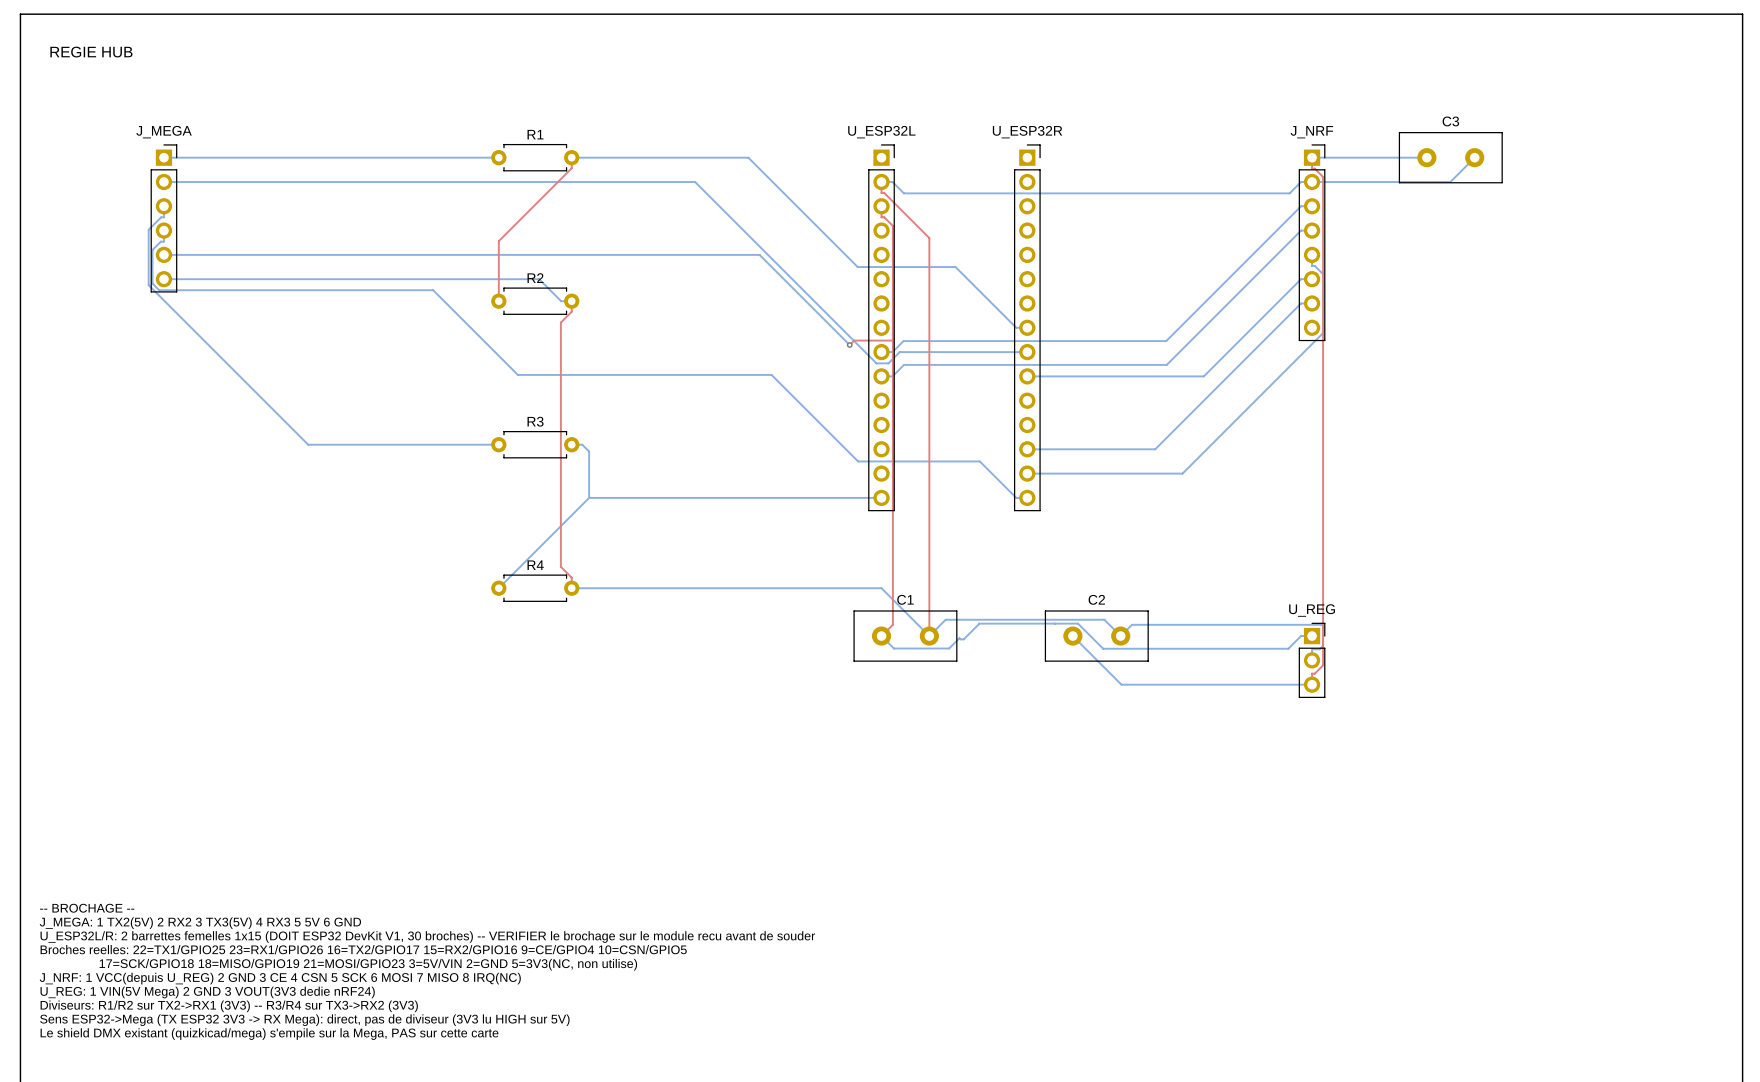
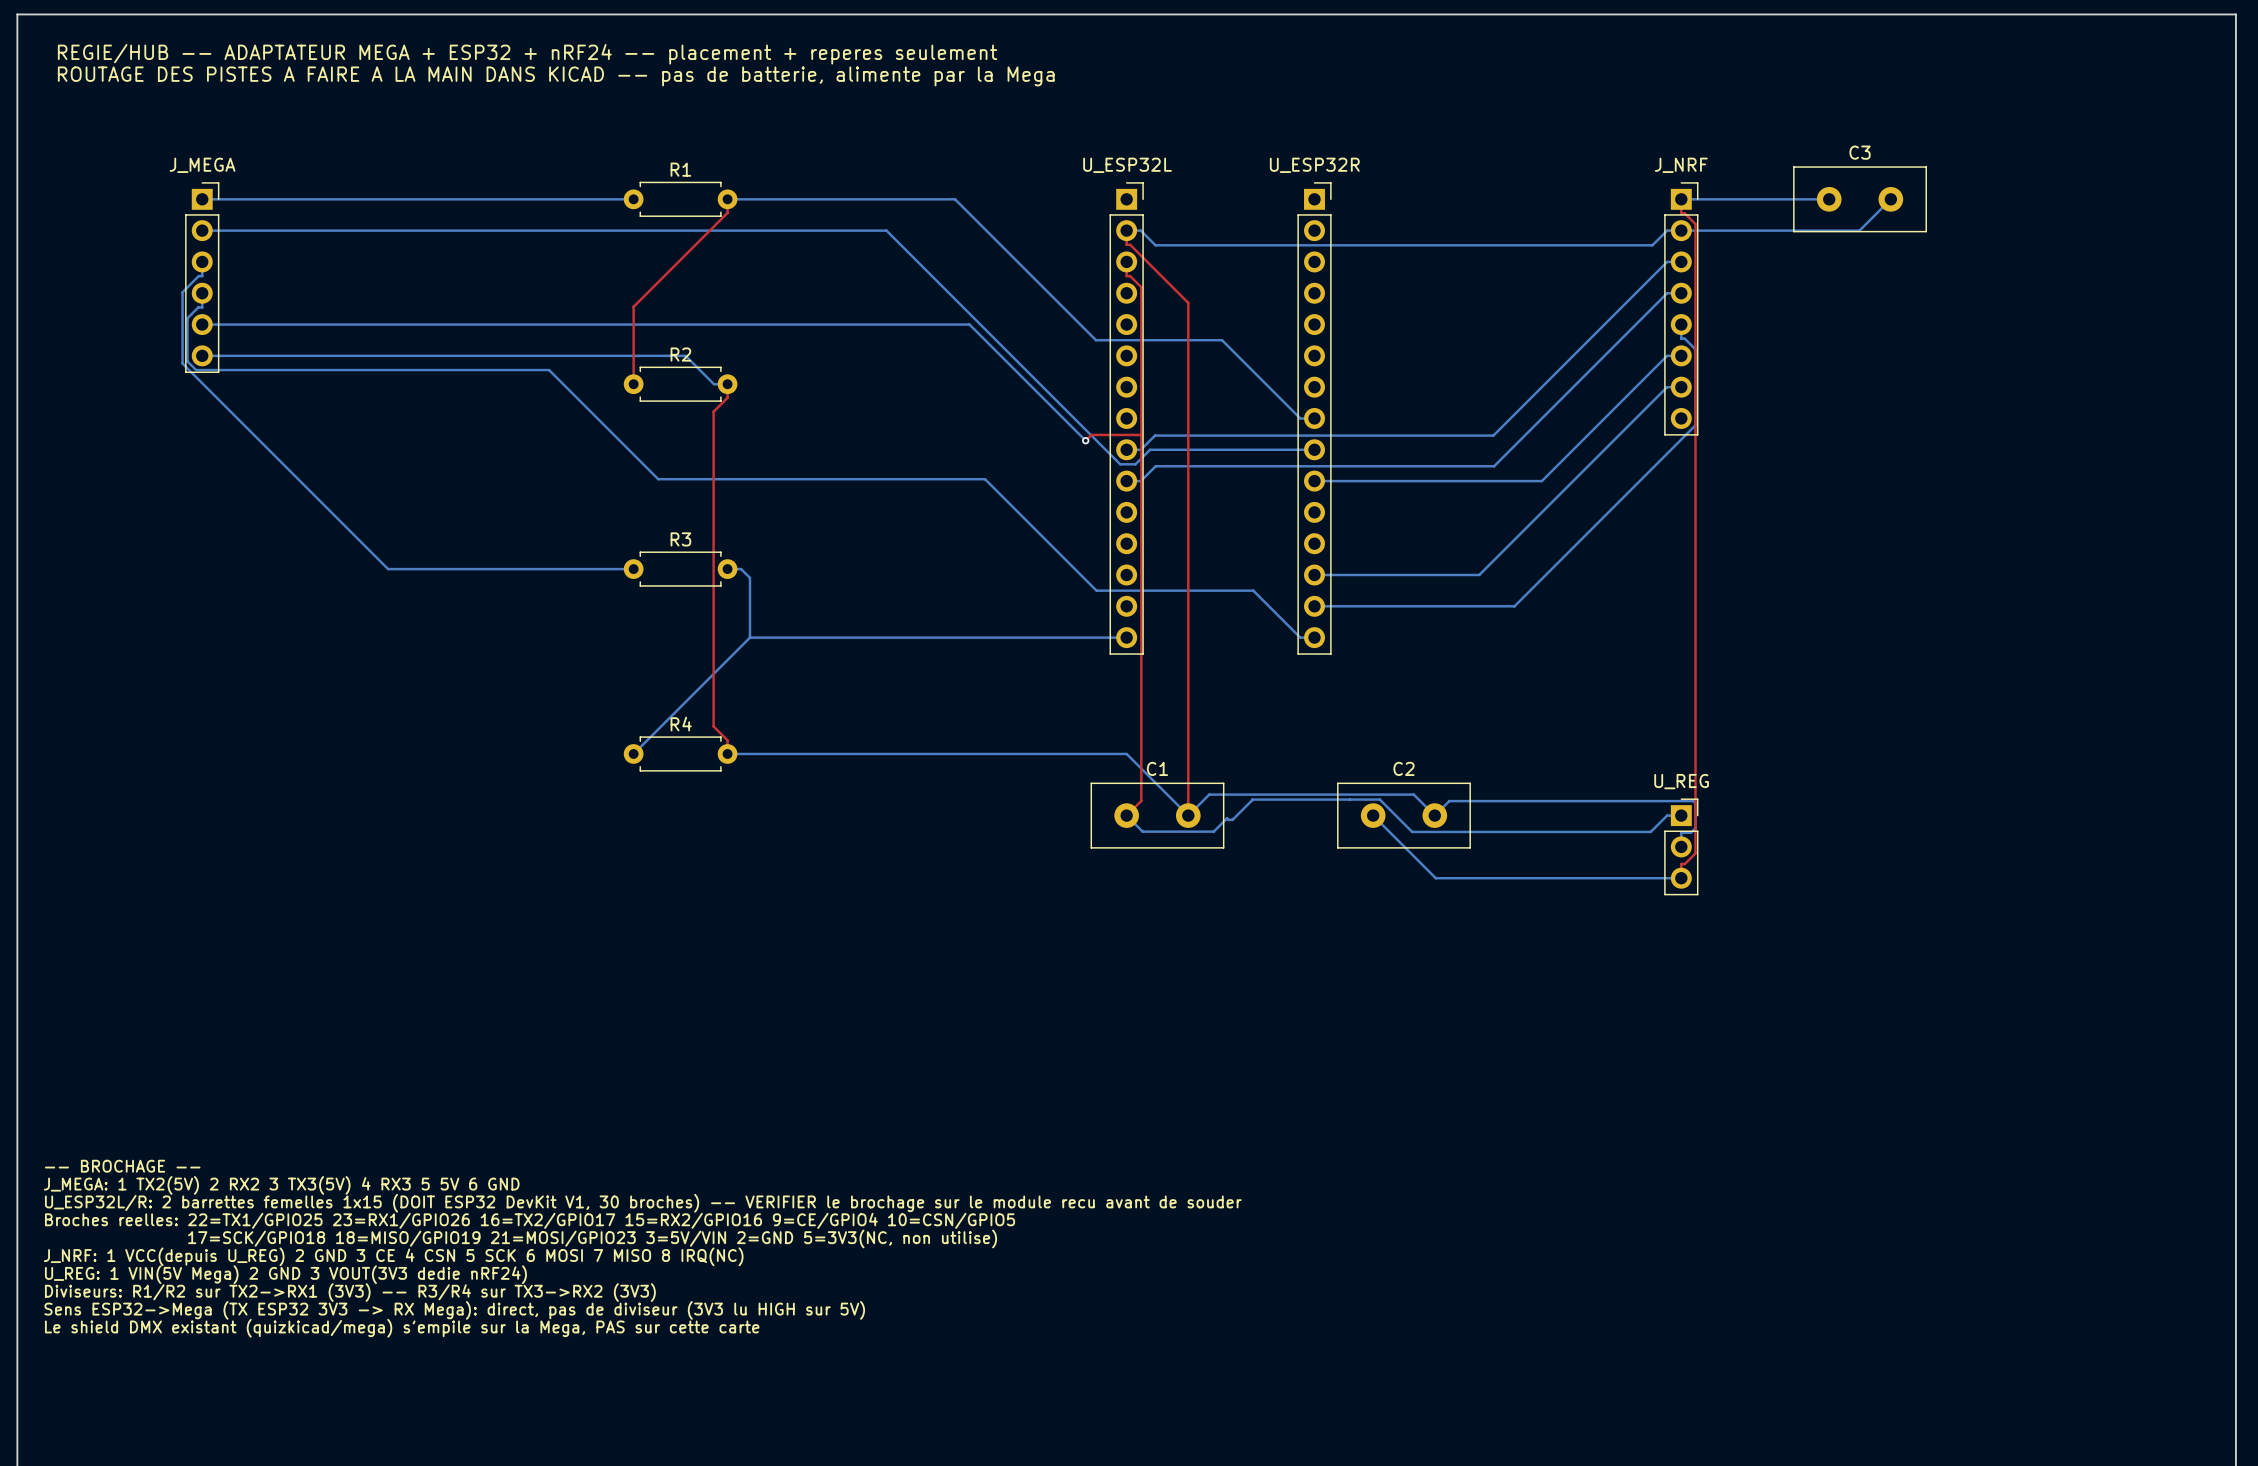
text: none -> REGIE/HUB -- ADAPTATEUR MEGA + ESP32 + nRF24 -- placement + reperes seulement (527, 54)
text: REGIE HUB (91, 52) -> none
text: none -> ROUTAGE DES PISTES A FAIRE A LA MAIN DANS KICAD -- pas de batterie, alimente par la Mega (556, 76)

